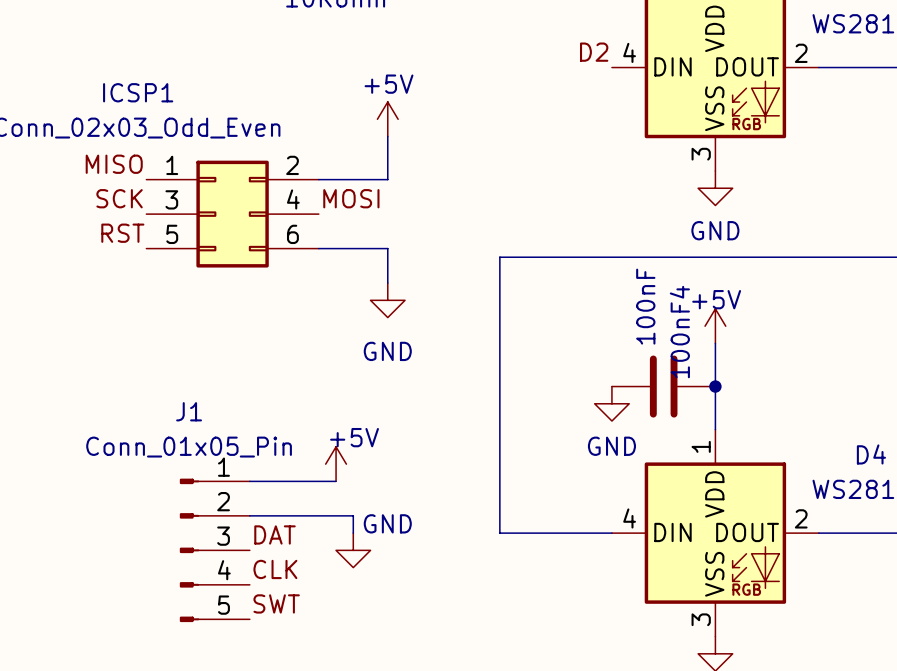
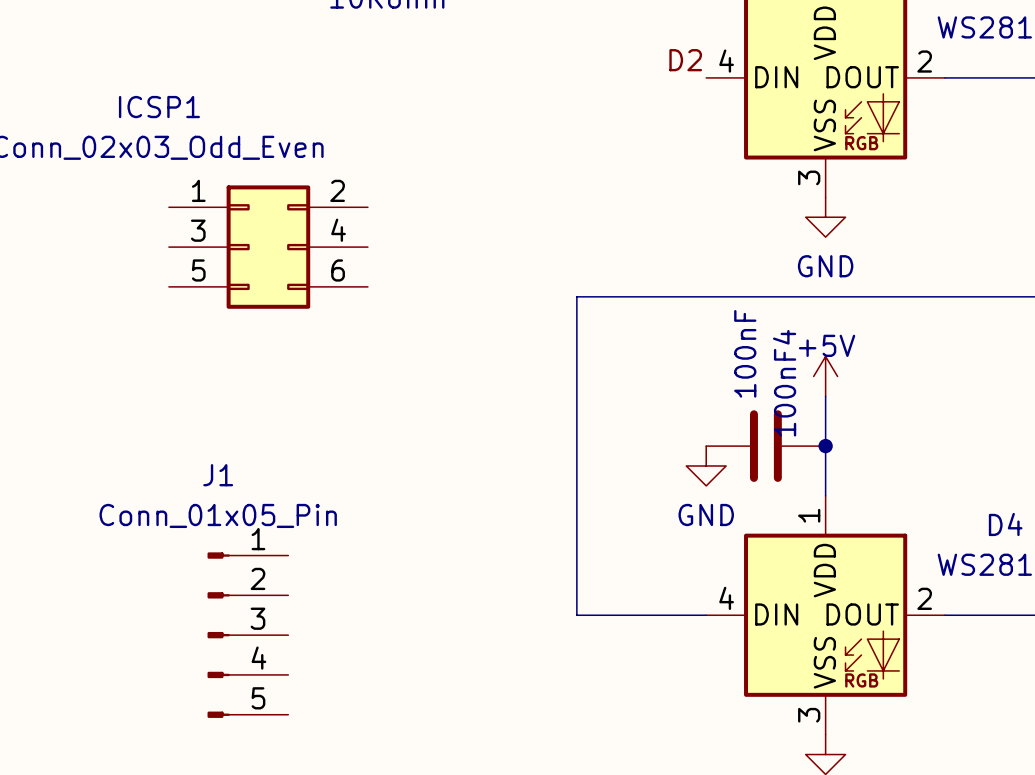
power symbol: +5V (387, 119) -> none
wire: (387, 136) (387, 179) (318, 179) -> none
label: MISO (114, 164) -> none
label: SCK (119, 198) -> none
label: MOSI (351, 198) -> none
label: RST (122, 233) -> none
wire: (318, 248) (387, 248) (387, 283) -> none
power symbol: GND (387, 300) -> none
power symbol: +5V (336, 464) -> none
wire: (249, 481) (336, 481) -> none
wire: (249, 515) (353, 515) (353, 533) -> none
label: DAT (275, 534) -> none
power symbol: GND (353, 550) -> none
label: CLK (275, 569) -> none
label: SWT (276, 603) -> none

